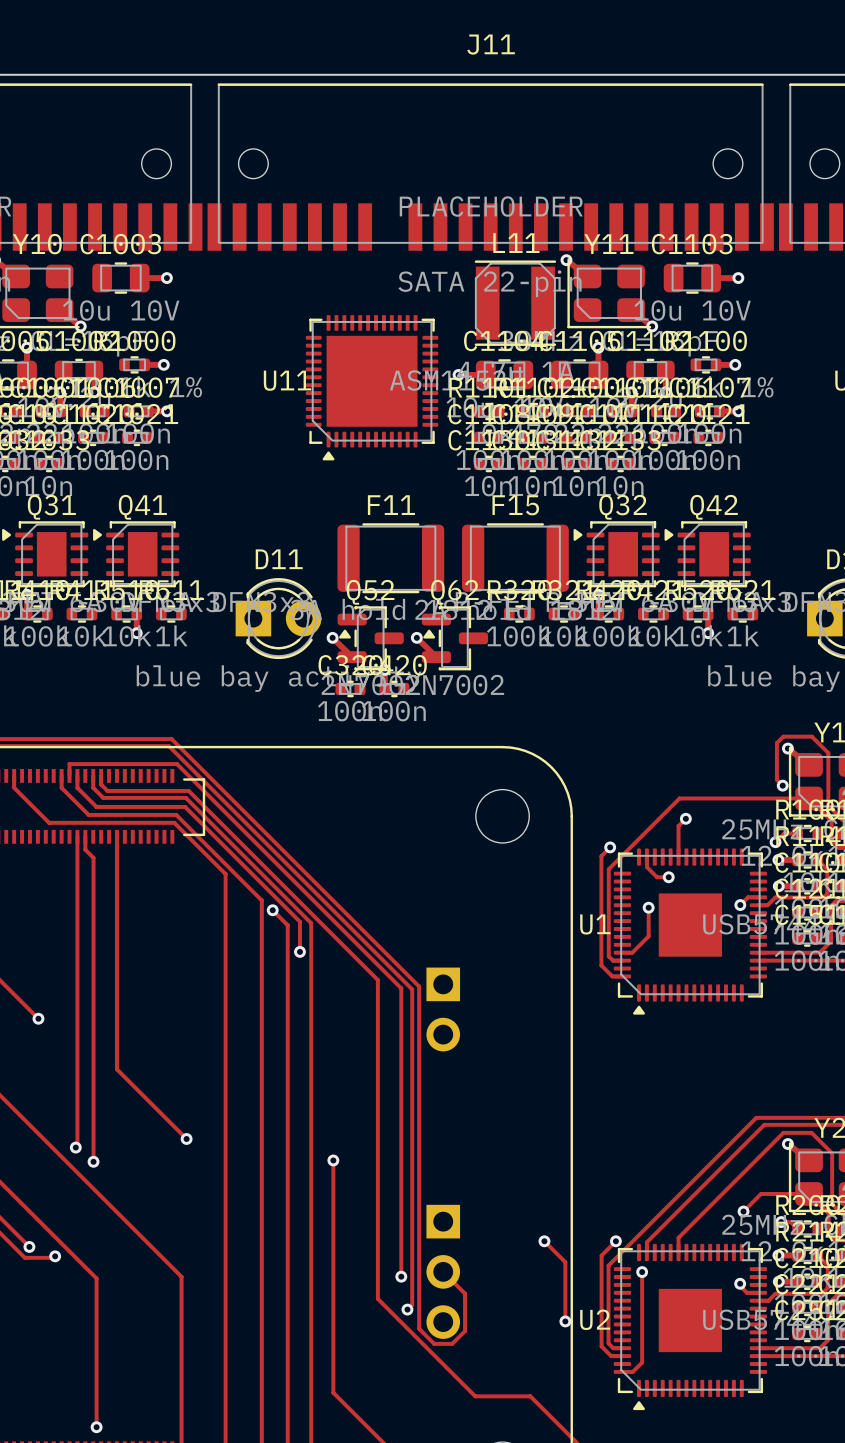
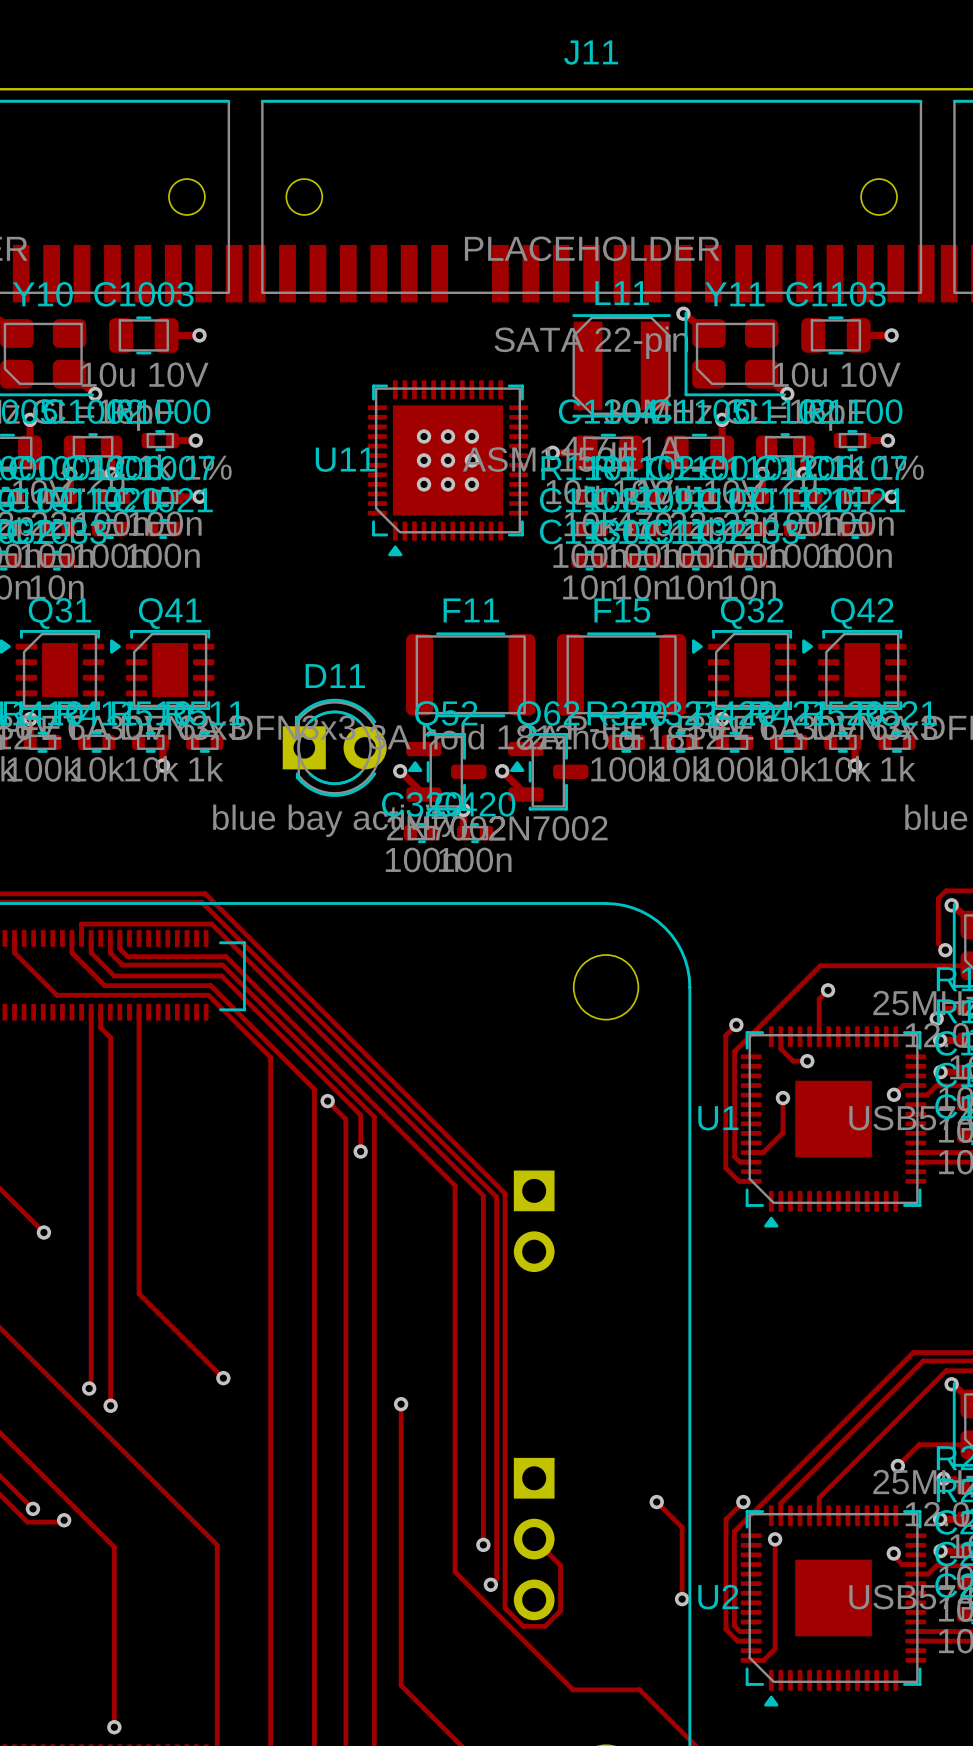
via: none -> (424, 436)
via: none -> (447, 436)
via: none -> (471, 436)
via: none -> (424, 460)
via: none -> (447, 460)
via: none -> (471, 460)
via: none -> (424, 484)
via: none -> (447, 484)
via: none -> (471, 484)

